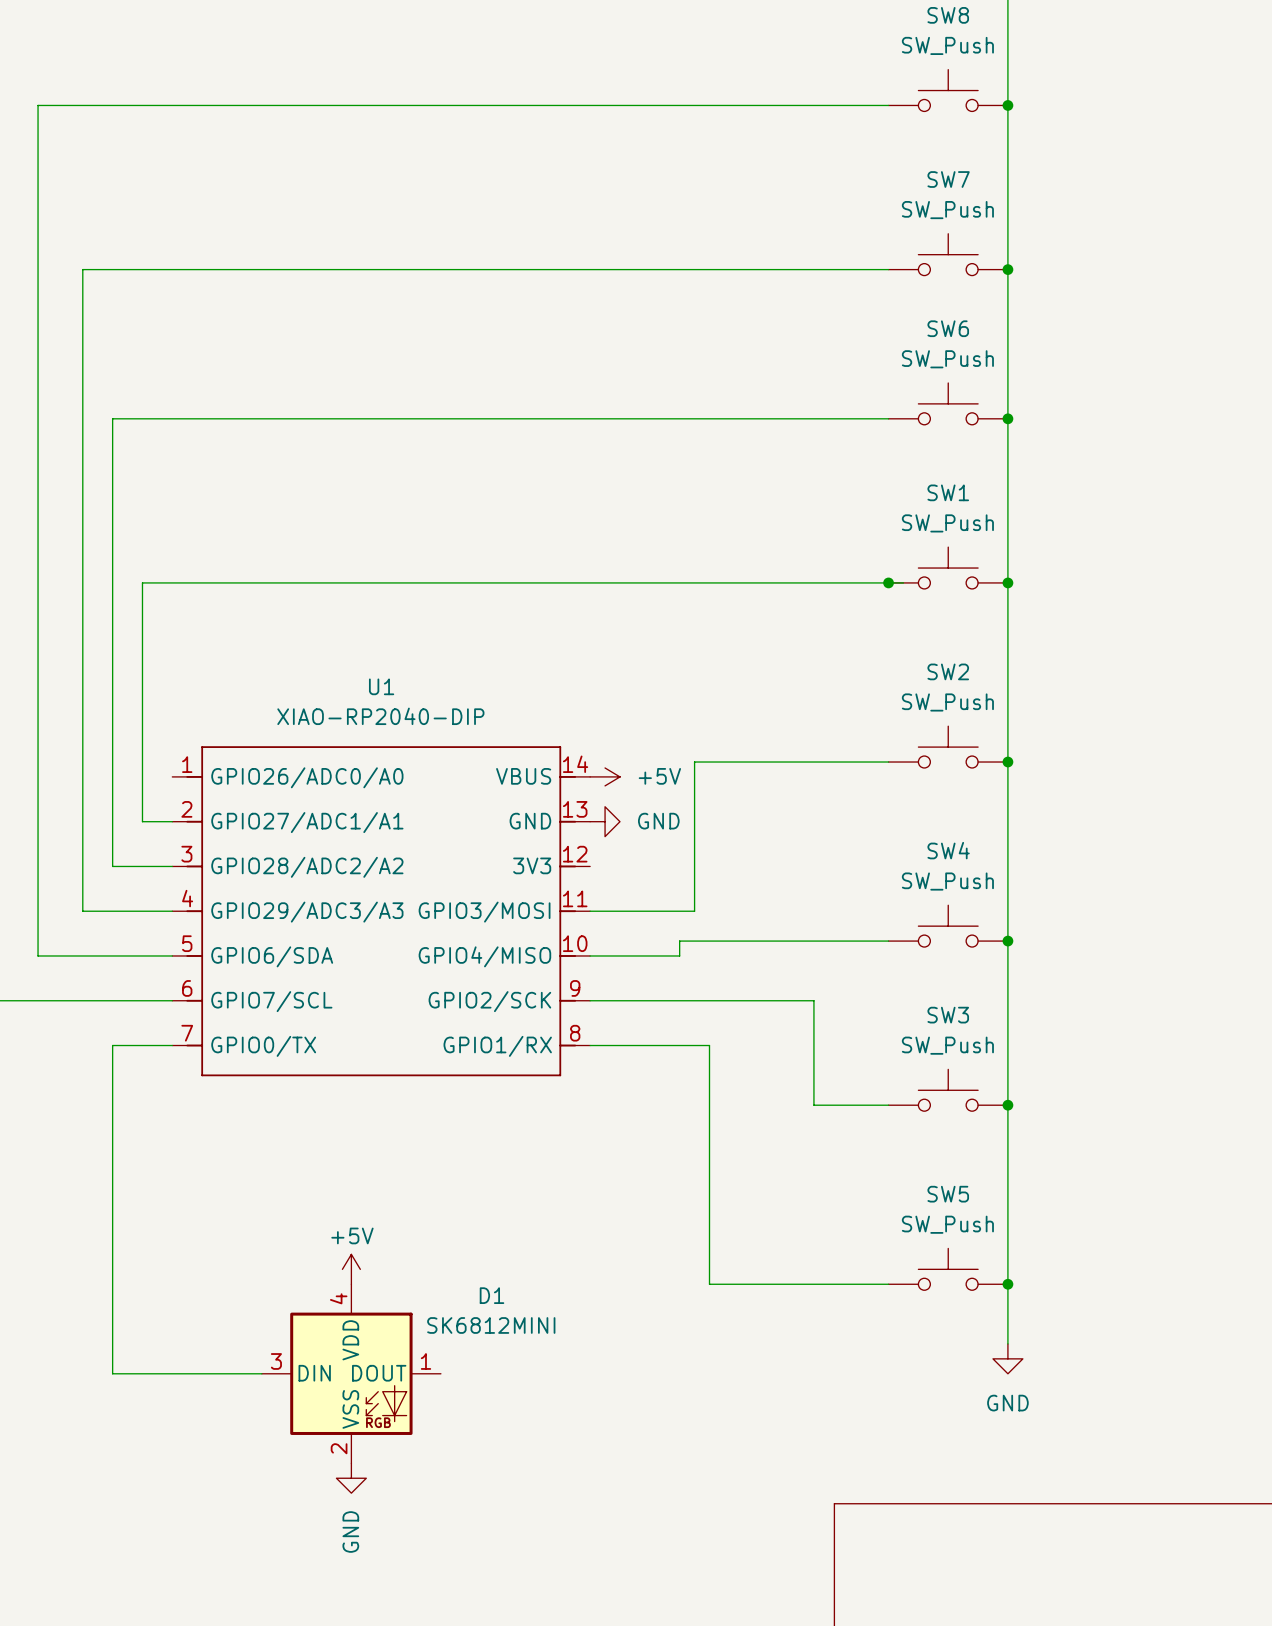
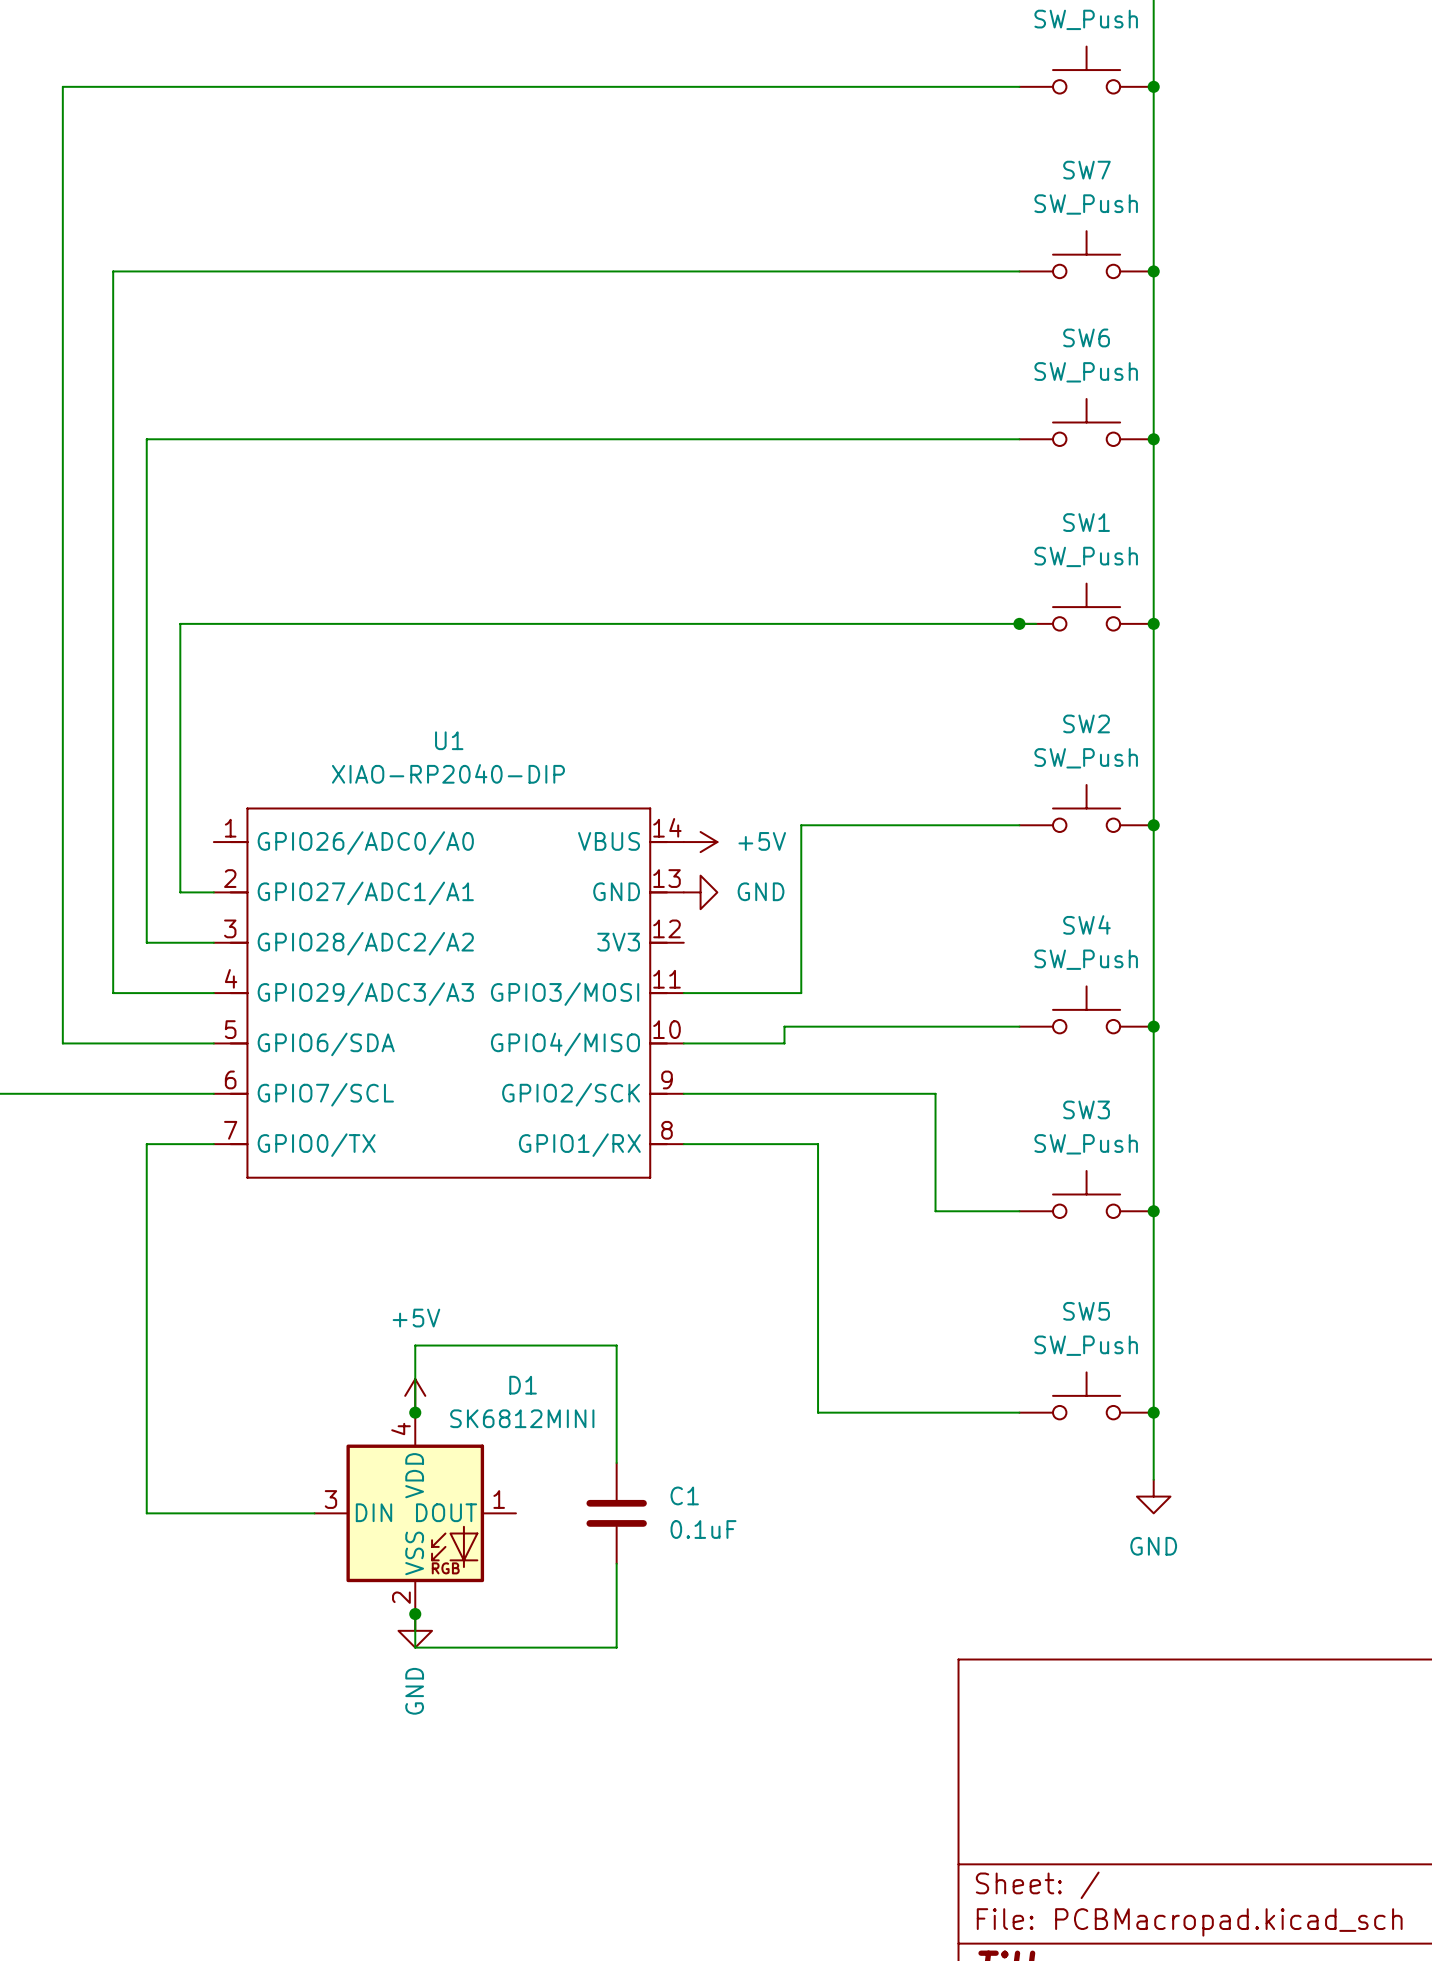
power symbol text position: +5V (352, 1235) -> +5V (416, 1318)
wire: none -> (415, 1412) (415, 1345) (616, 1345) (616, 1463)
junction: none -> (415, 1412)
D1 name position: D1 (492, 1295) -> D1 (523, 1385)
D1 value position: SK6812MINI (491, 1325) -> SK6812MINI (522, 1418)
C1: none -> 0.1uF (616, 1513)
wire: none -> (616, 1563) (616, 1647) (415, 1647) (415, 1614)
junction: none -> (415, 1614)

